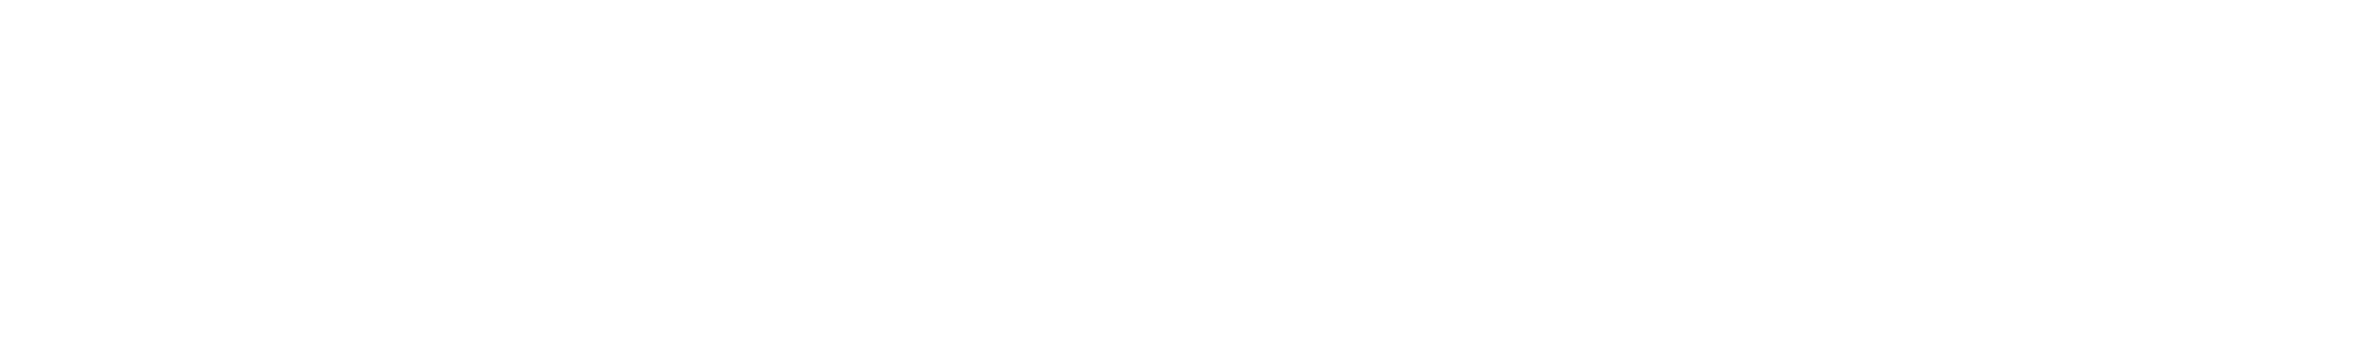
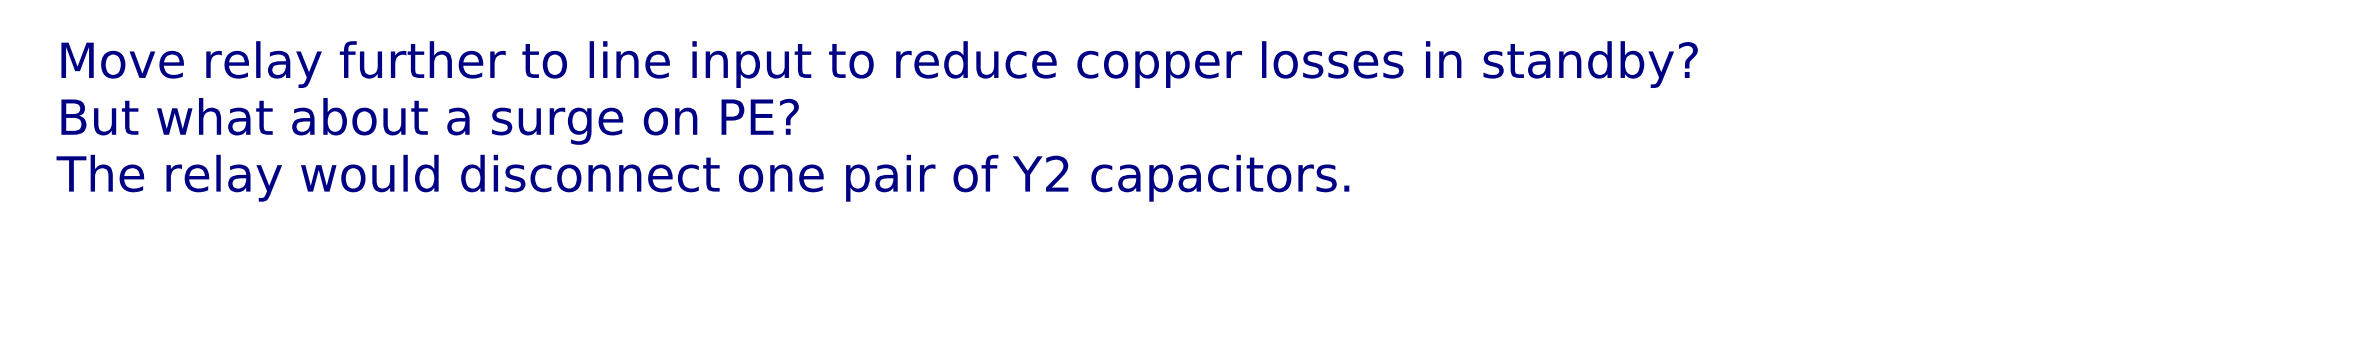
text: none -> Move relay further to line input to reduce copper losses in standby? (879, 64)
text: none -> But what about a surge on PE? (430, 121)
text: none -> The relay would disconnect one pair of Y2 capacitors. (702, 178)

